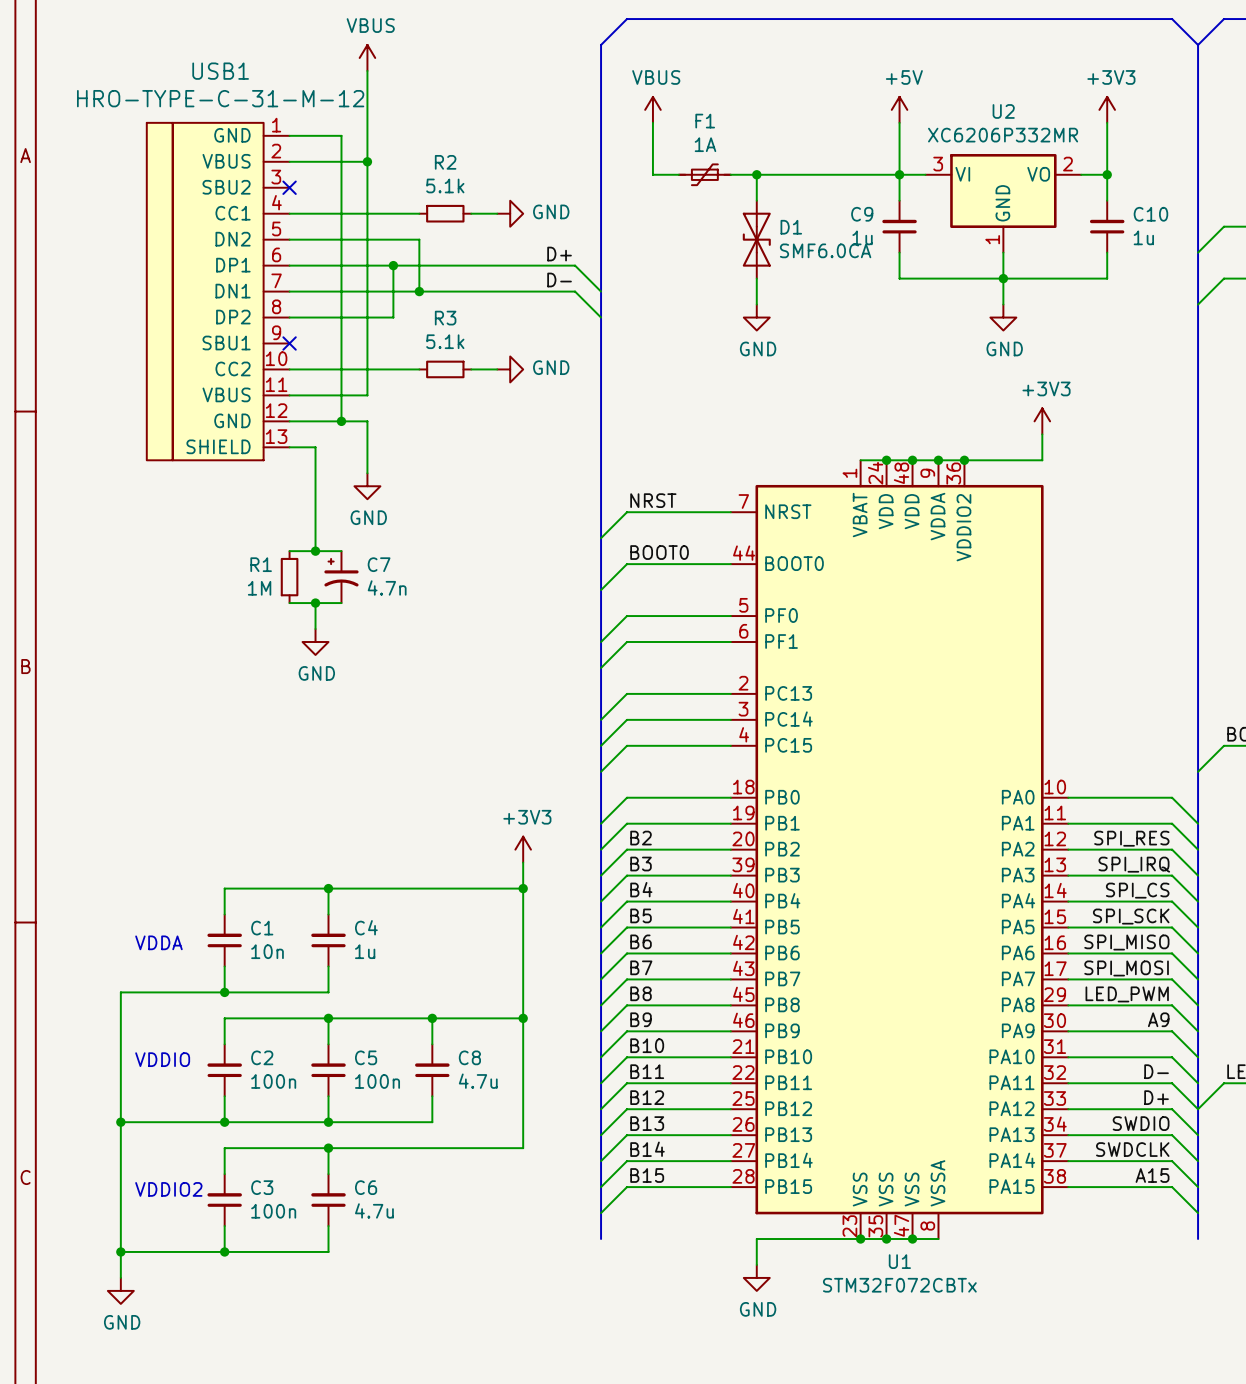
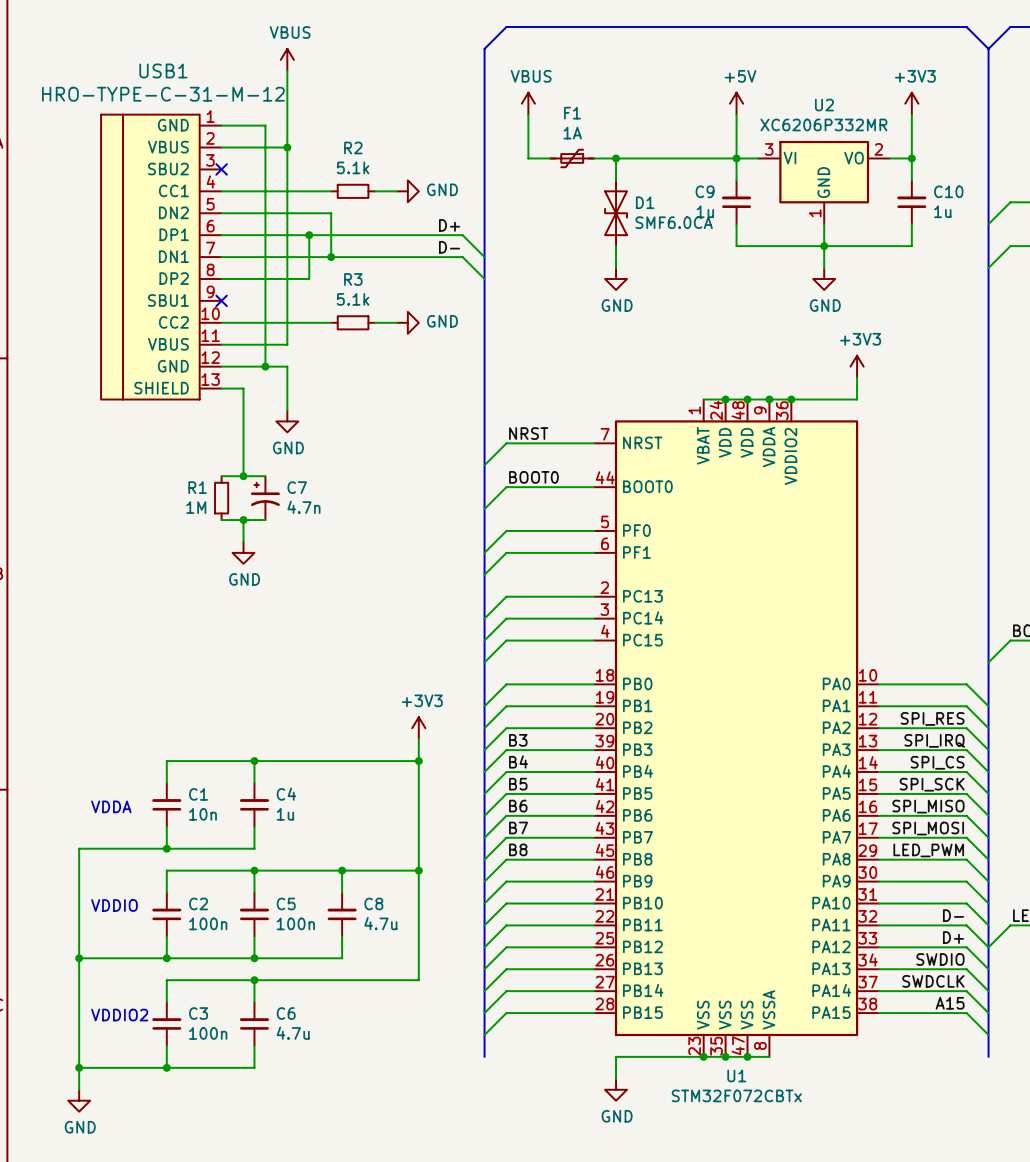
label: B2 (641, 838) -> none
label: B9 (641, 1019) -> none
label: A9 (1158, 1019) -> none
label: B10 (647, 1045) -> none
label: B11 (647, 1071) -> none
label: B12 (647, 1097) -> none
label: B13 (647, 1123) -> none
label: B14 (647, 1149) -> none
label: B15 (647, 1175) -> none

